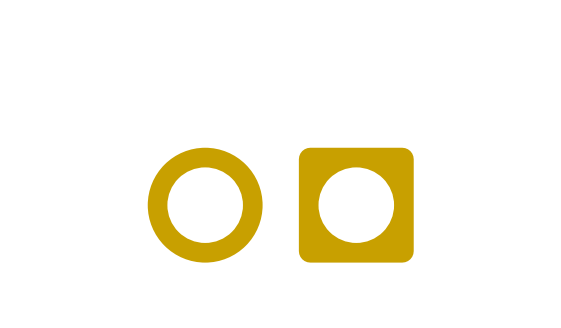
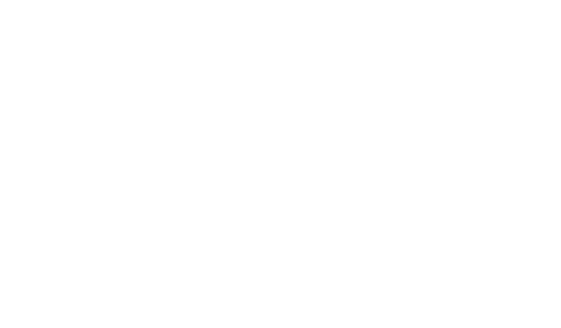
part: (280, 205) -> none

